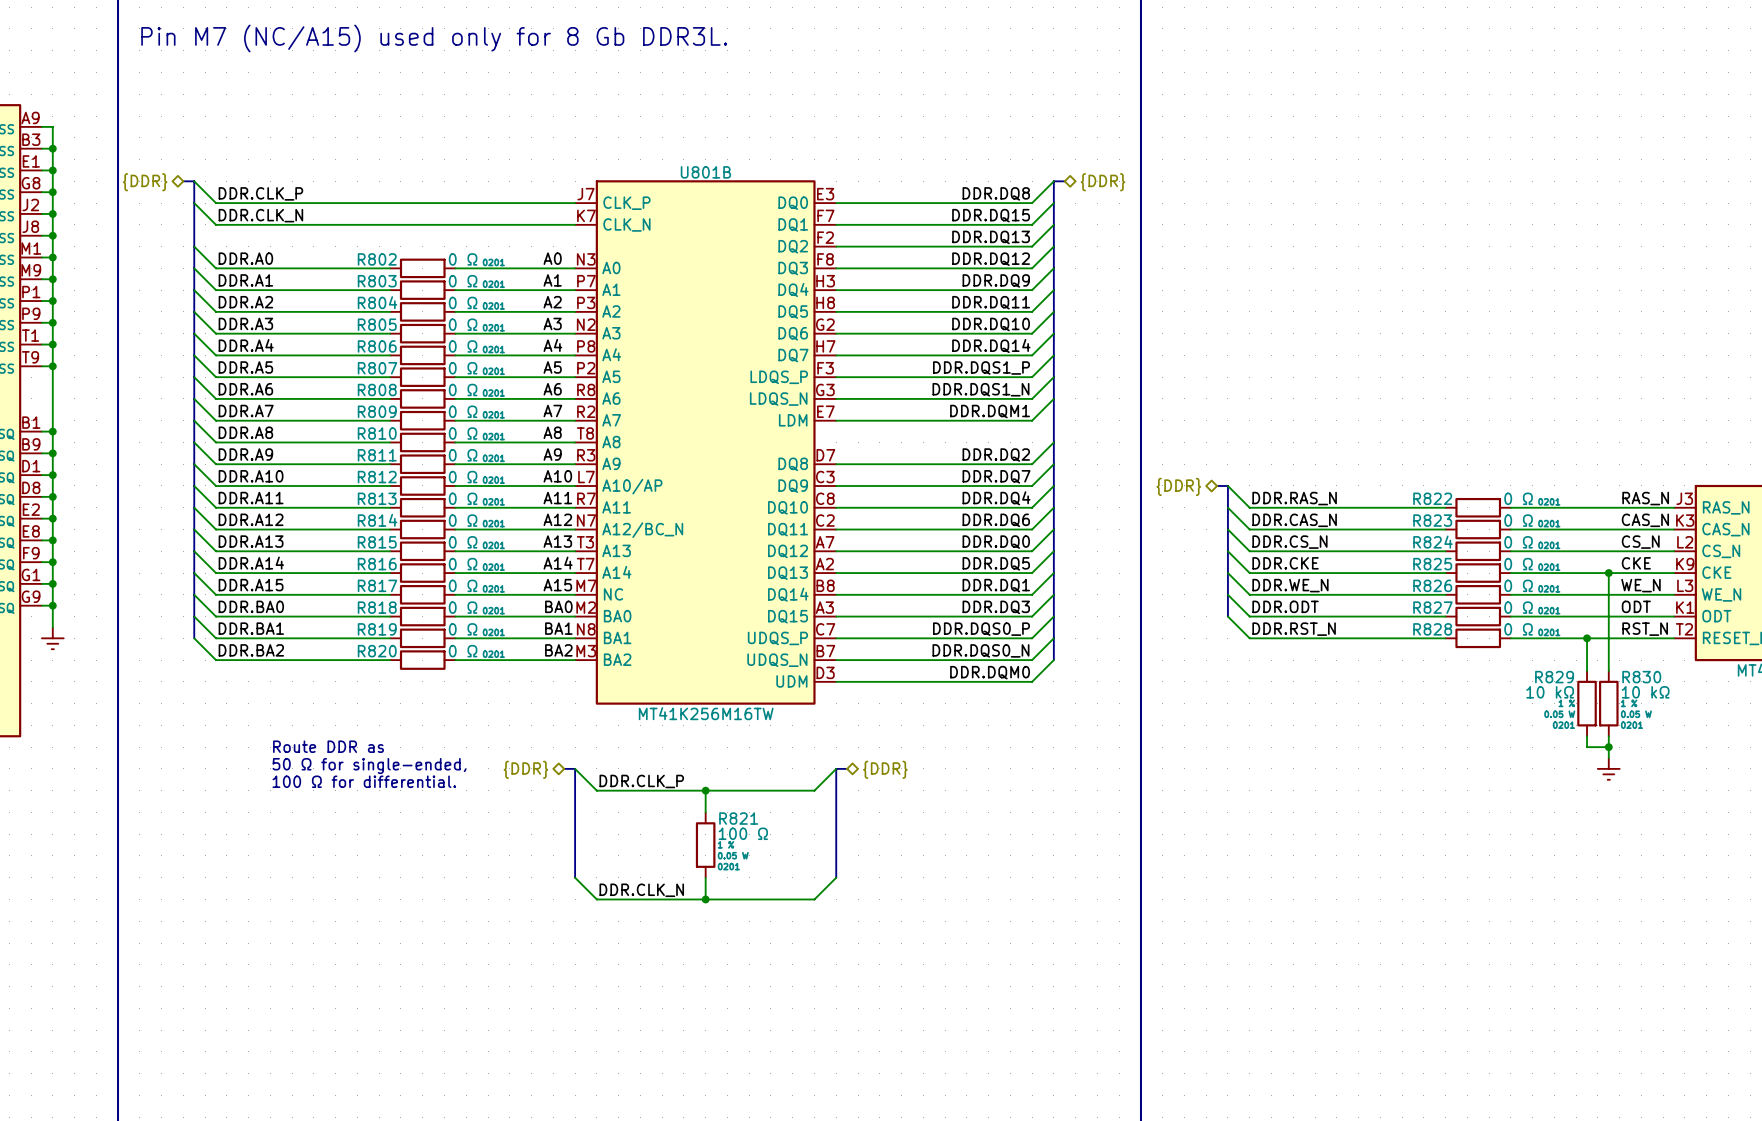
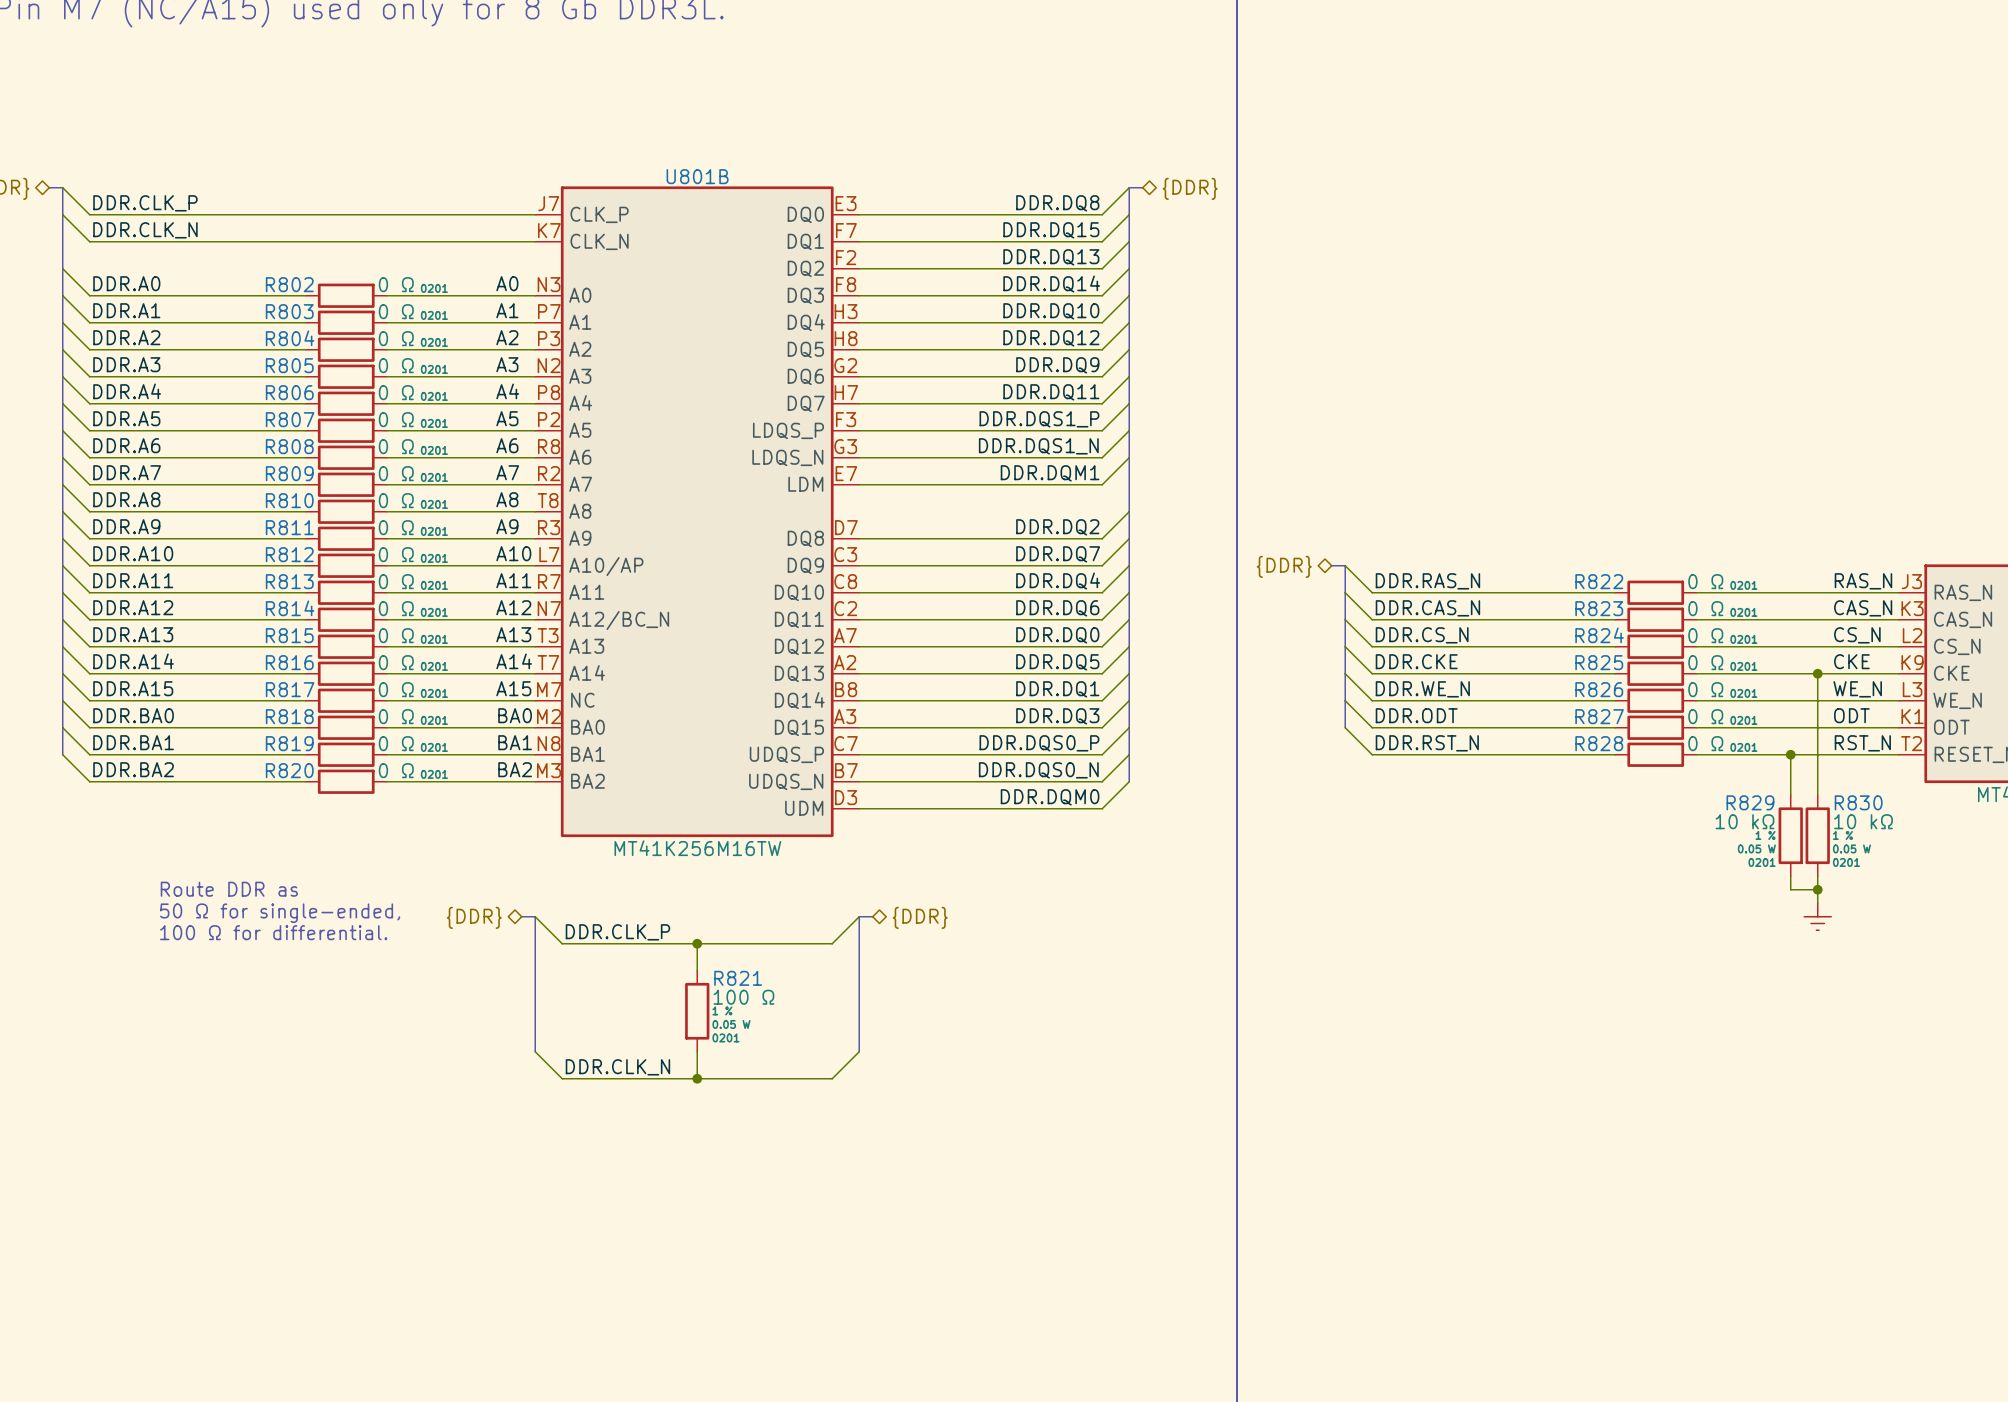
label: DDR.DQ12 (991, 259) -> DDR.DQ14 (1051, 284)
label: DDR.DQ9 (996, 280) -> DDR.DQ10 (1051, 311)
label: DDR.DQ11 (991, 302) -> DDR.DQ12 (1051, 338)
label: DDR.DQ10 (991, 324) -> DDR.DQ9 (1057, 365)
label: DDR.DQ14 (991, 345) -> DDR.DQ11 (1051, 392)

